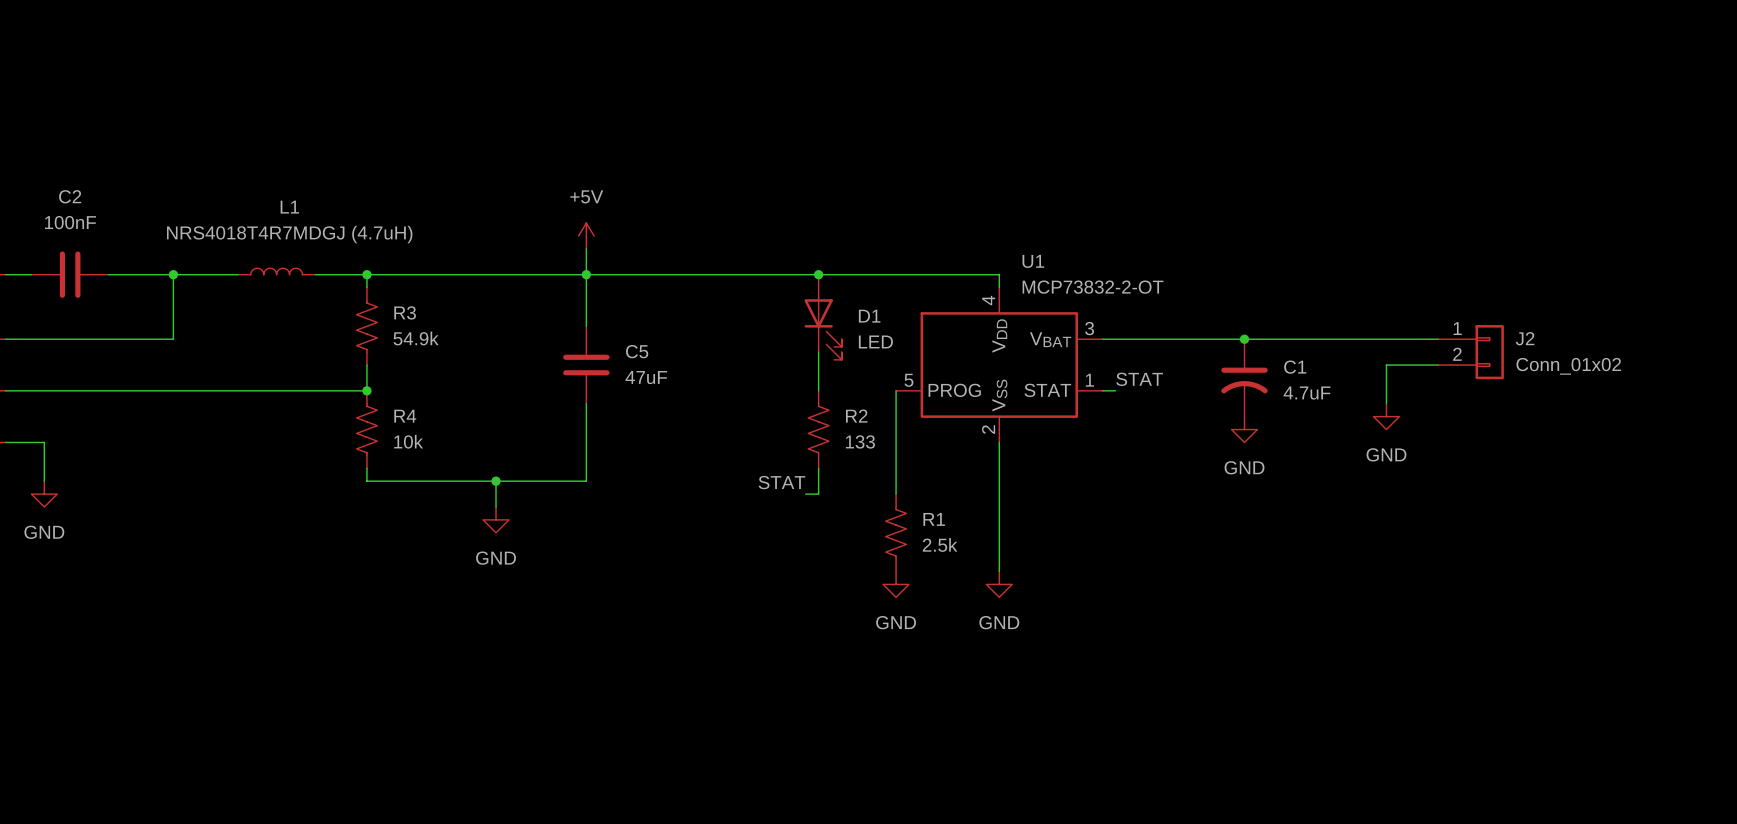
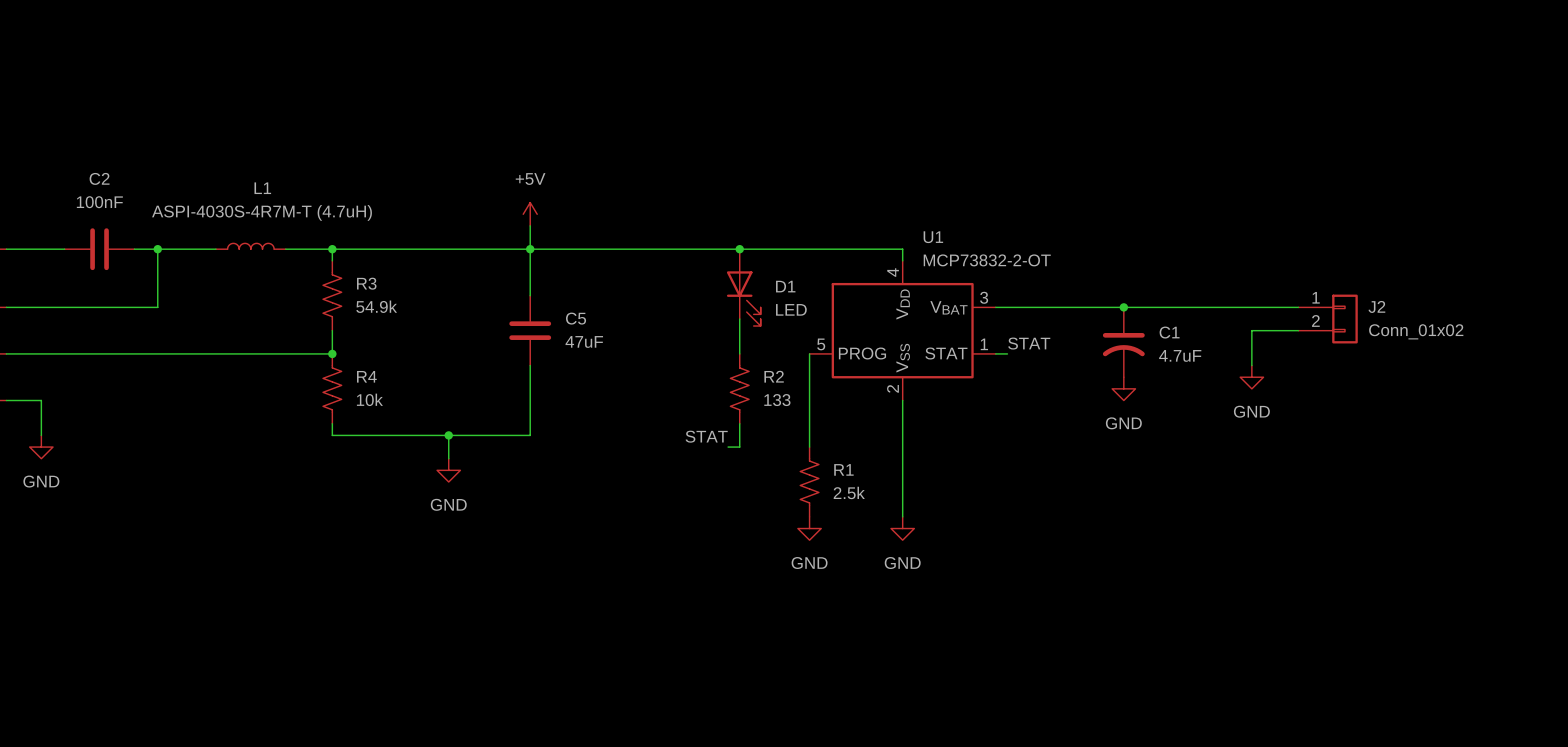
L1 value: NRS4018T4R7MDGJ (4.7uH) (289, 234) -> ASPI-4030S-4R7M-T (4.7uH) (262, 212)
C2 position: (70, 274) -> (99, 249)

